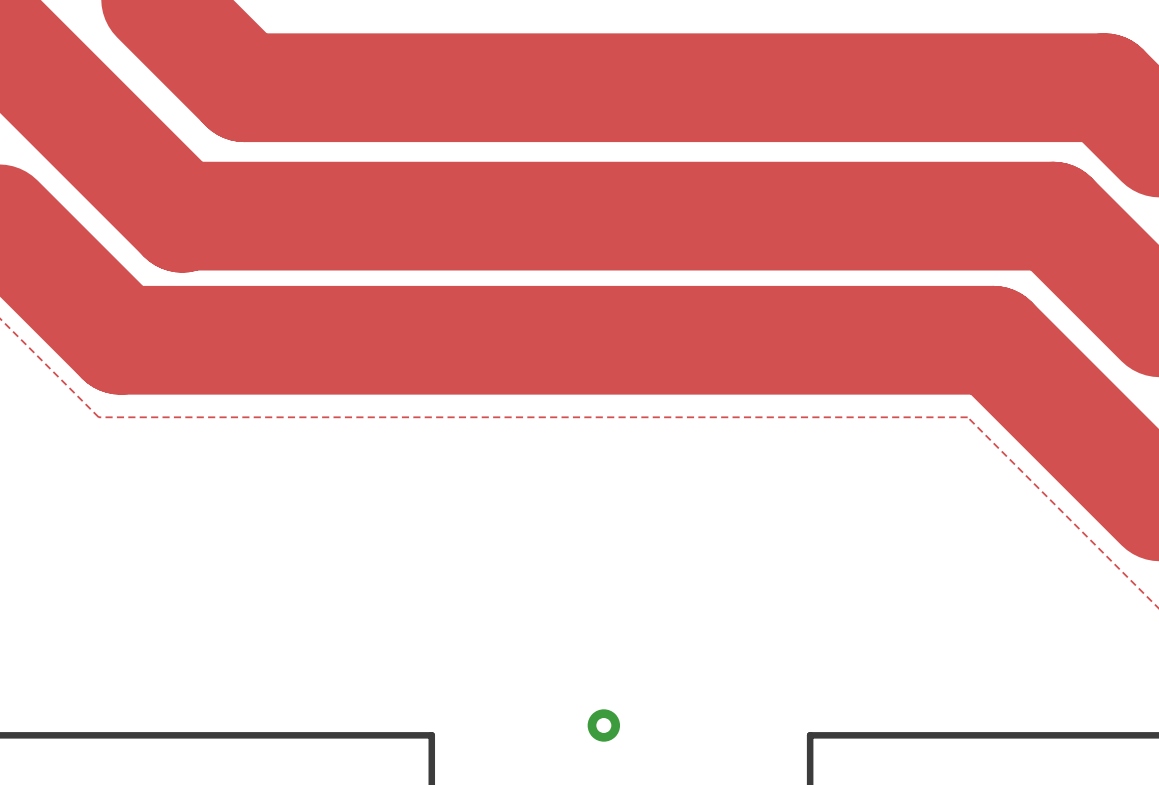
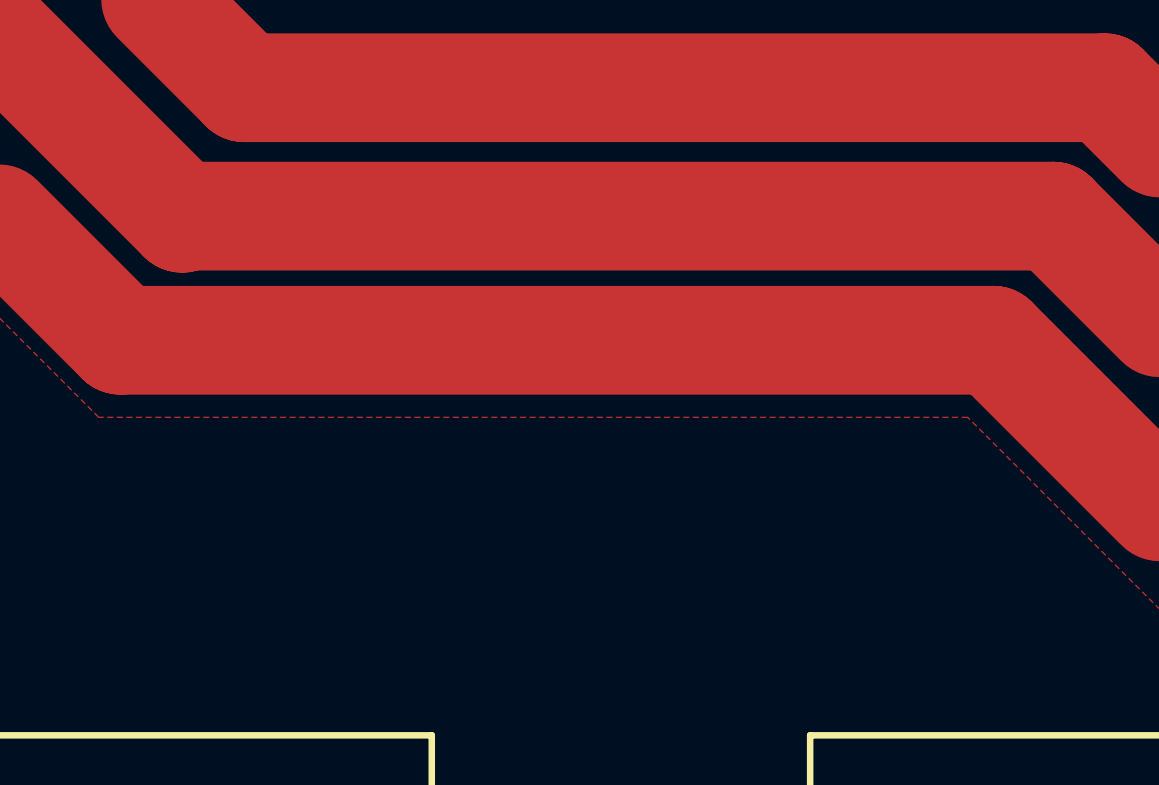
via: (603, 725) -> none

